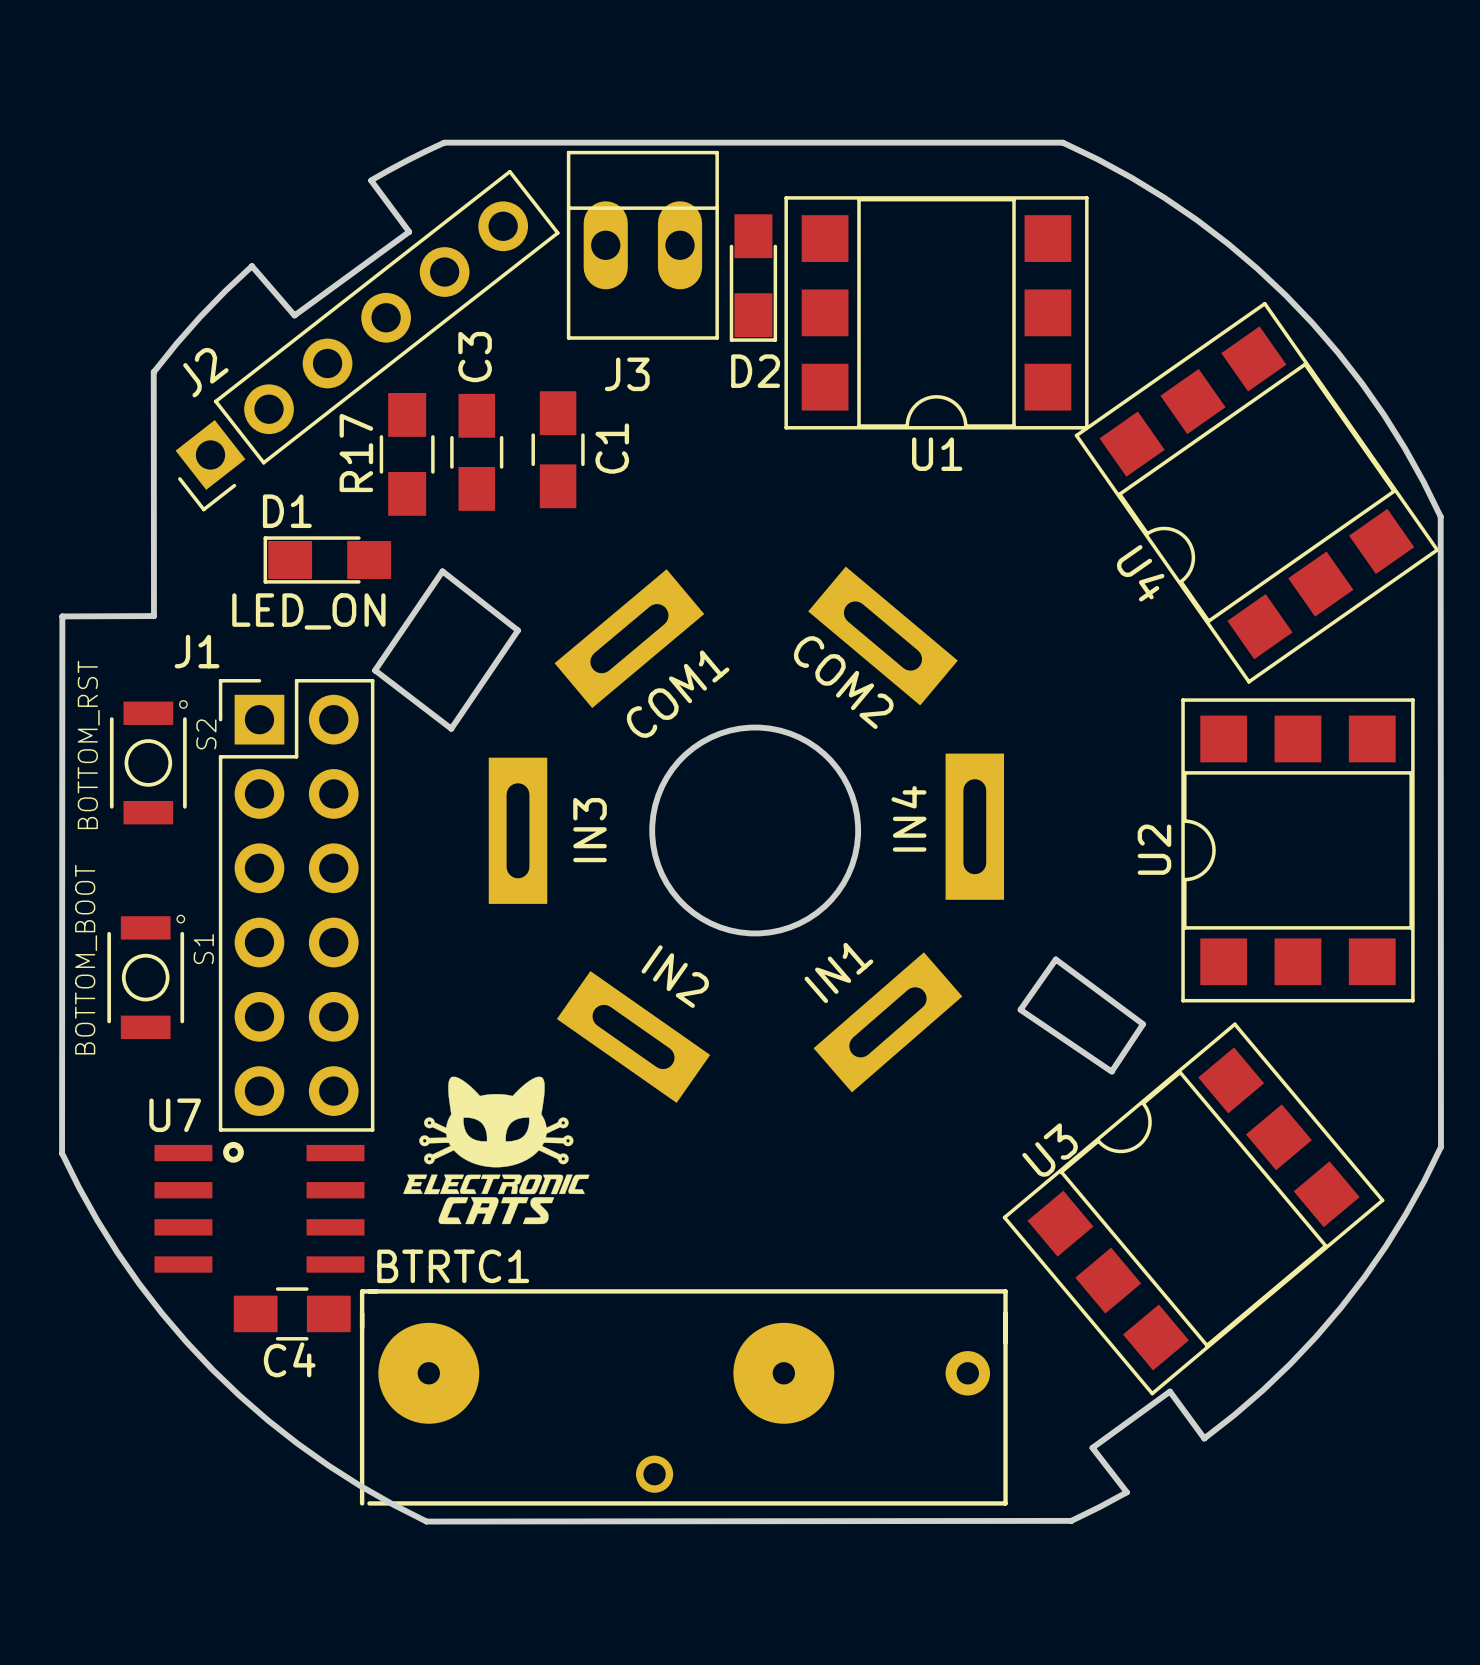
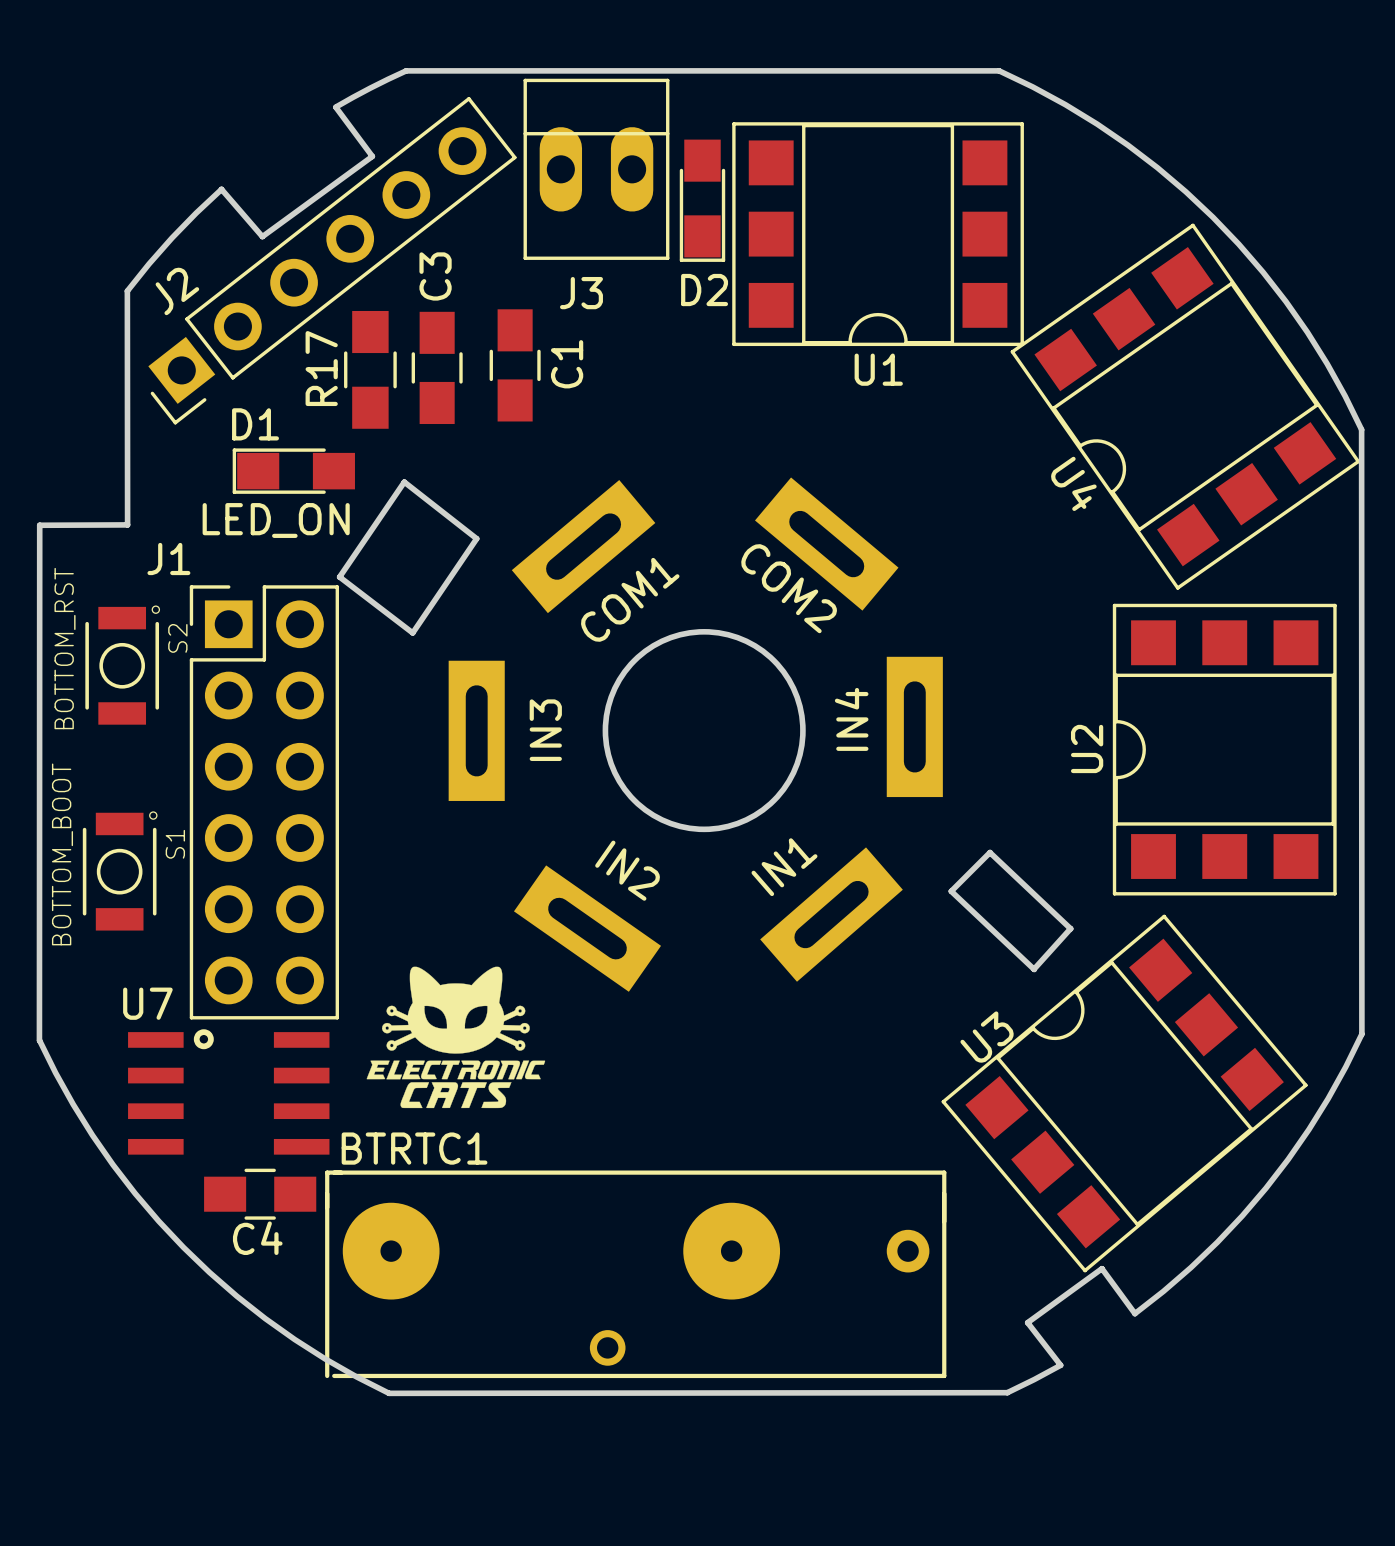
board edge: (1020, 1009) (1055, 959) (1142, 1024) -> none
board edge: (1020, 1009) (1111, 1071) -> none
board edge: (1142, 1024) (1111, 1071) -> none
board edge: none -> (1070, 928) (1034, 969)
board edge: none -> (1070, 928) (989, 852) (951, 891) (1034, 969)

